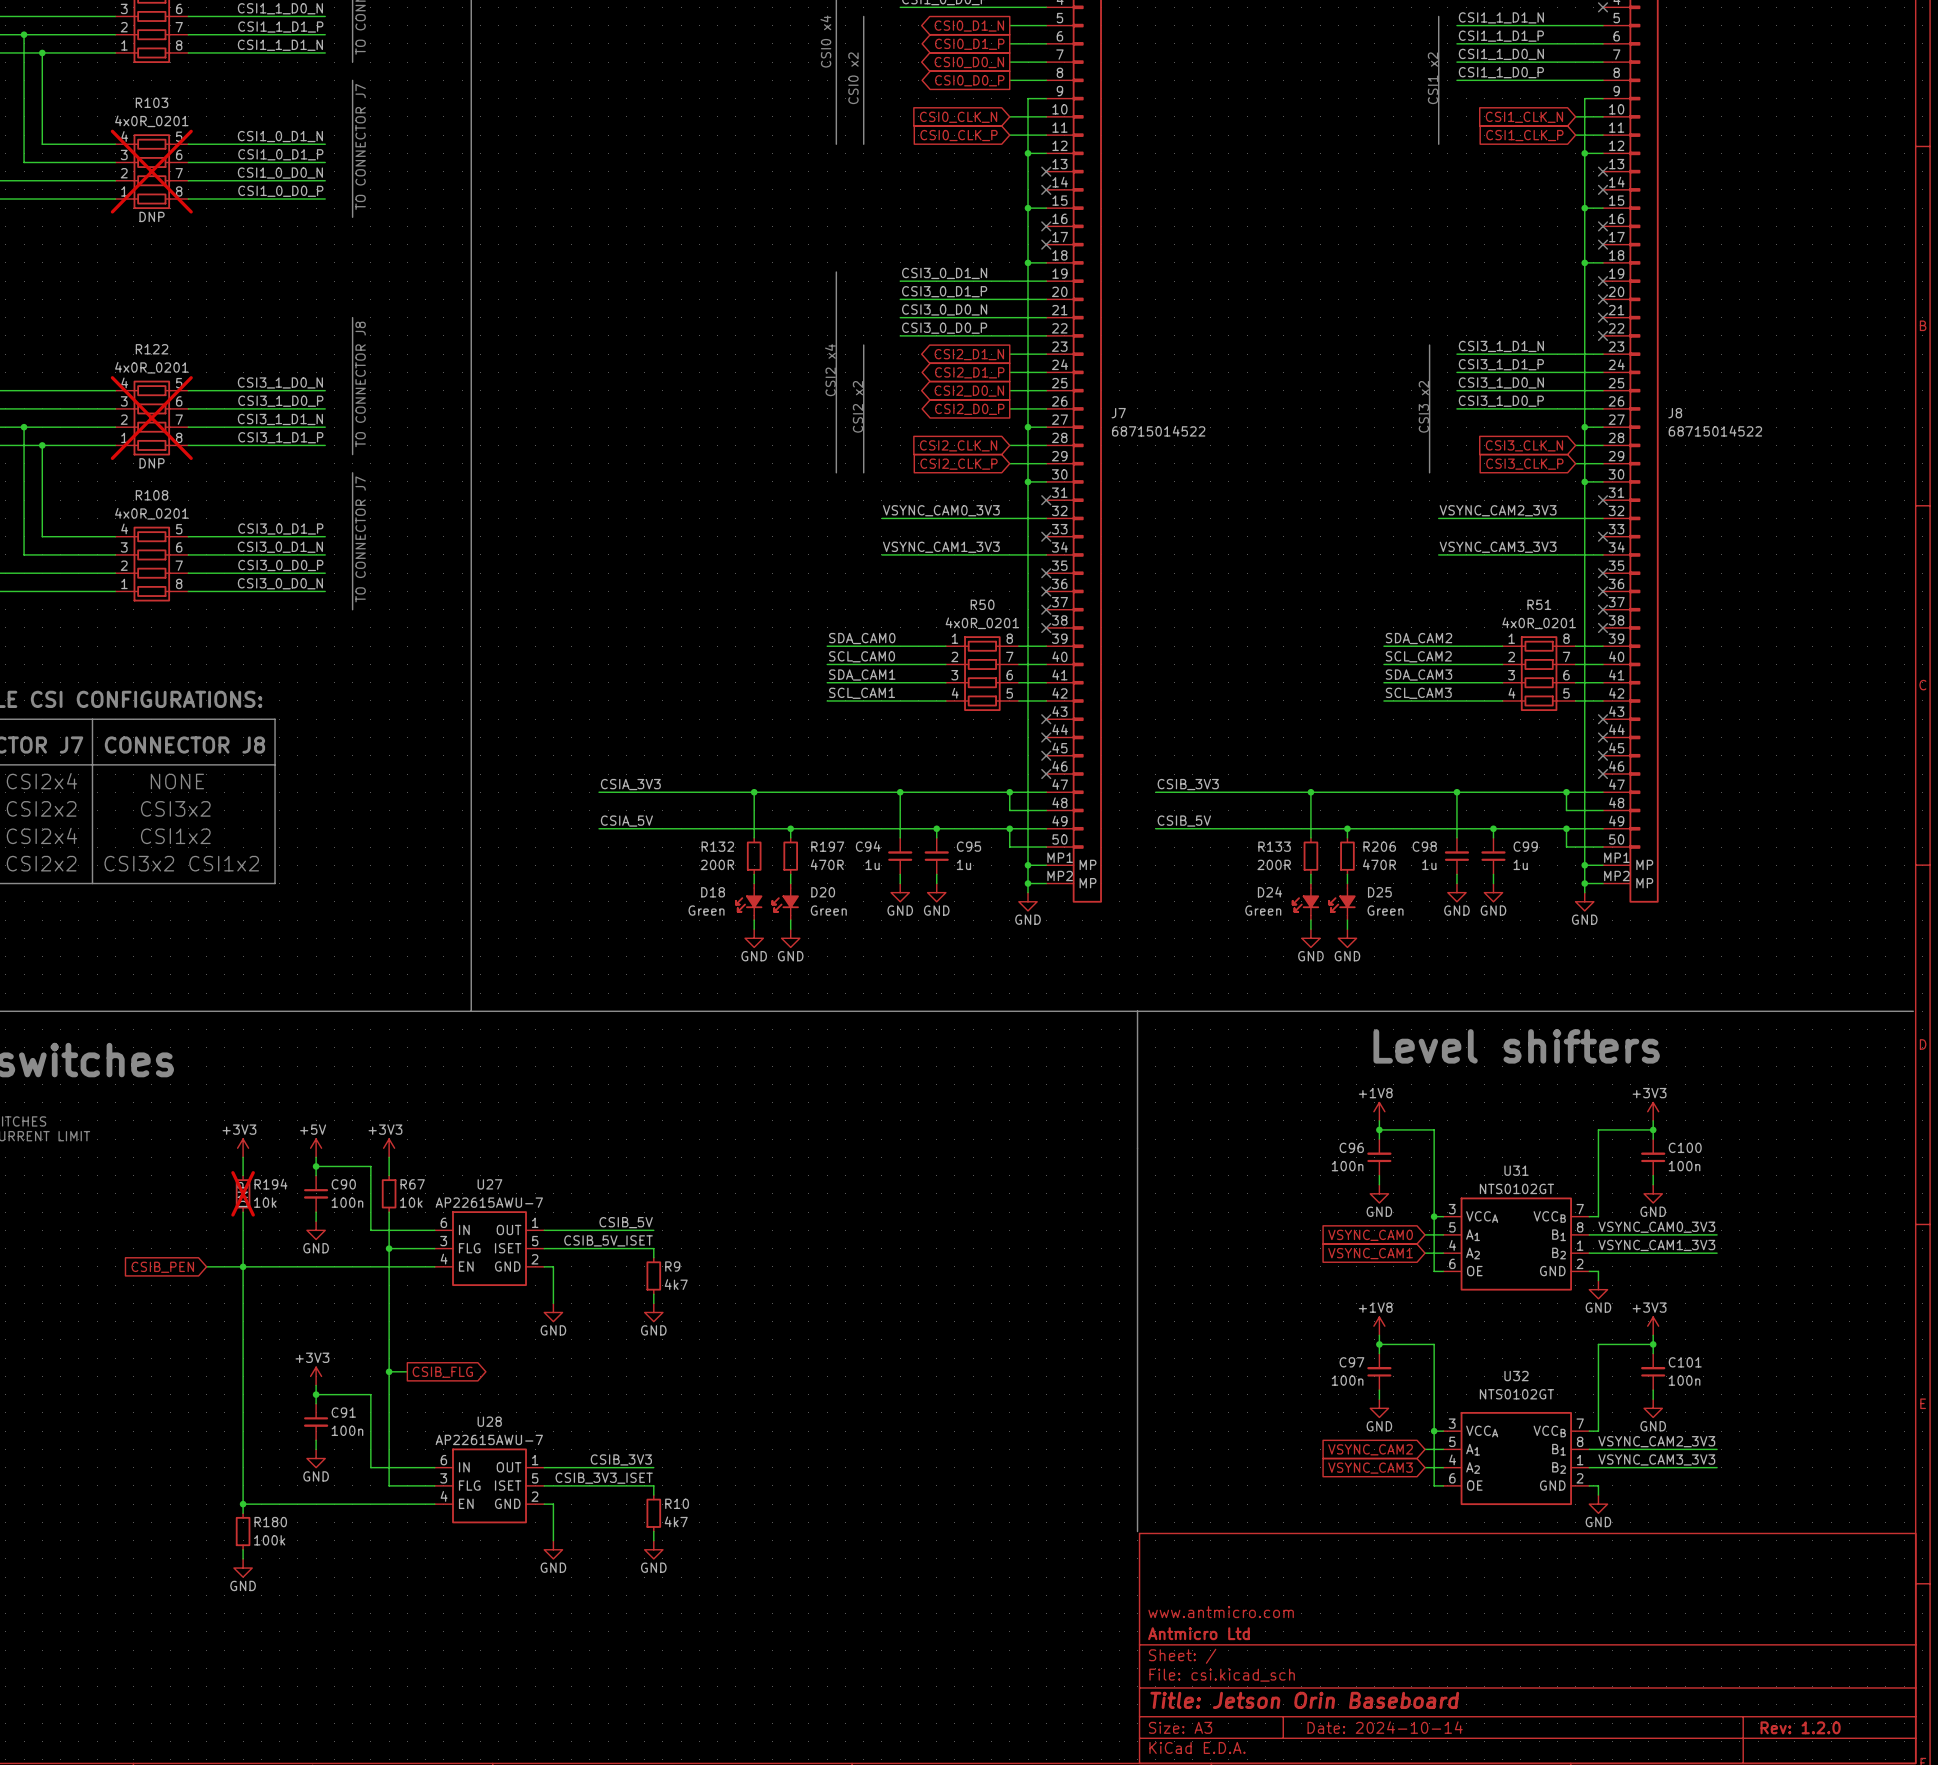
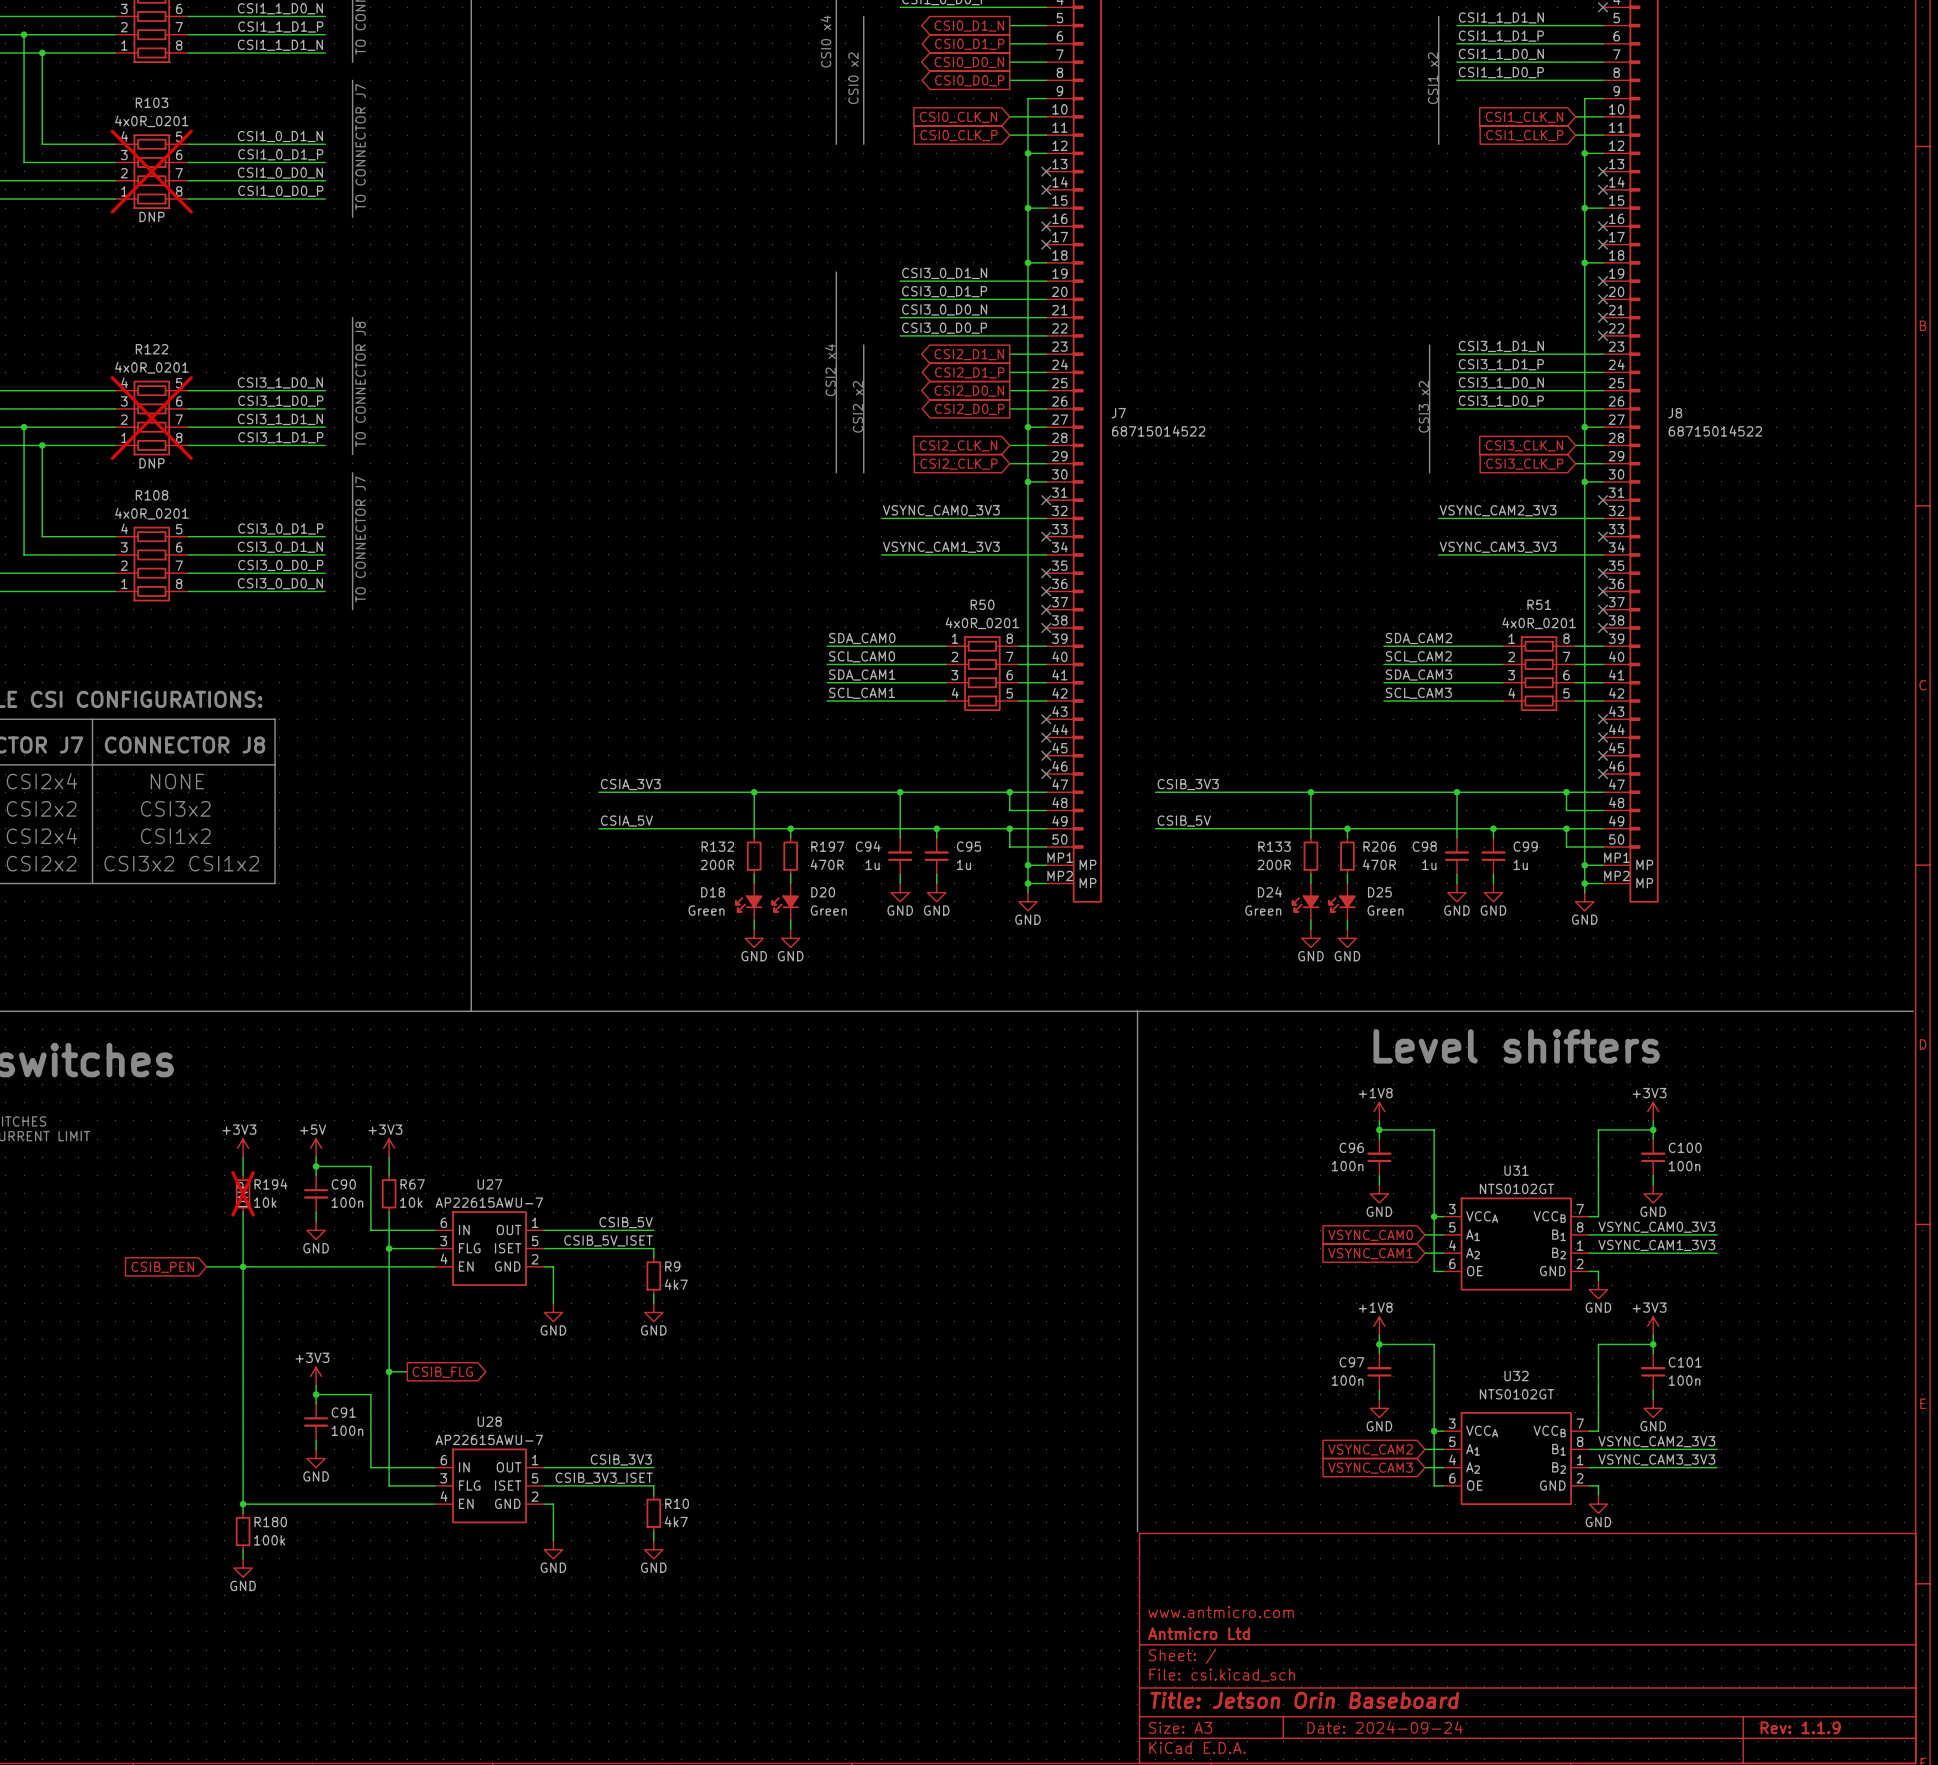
title block: Date: 2024-10-14 (1385, 1727) -> Date: 2024-09-24 (1385, 1727)
title block: Rev: 1.2.0 (1800, 1727) -> Rev: 1.1.9 (1800, 1727)

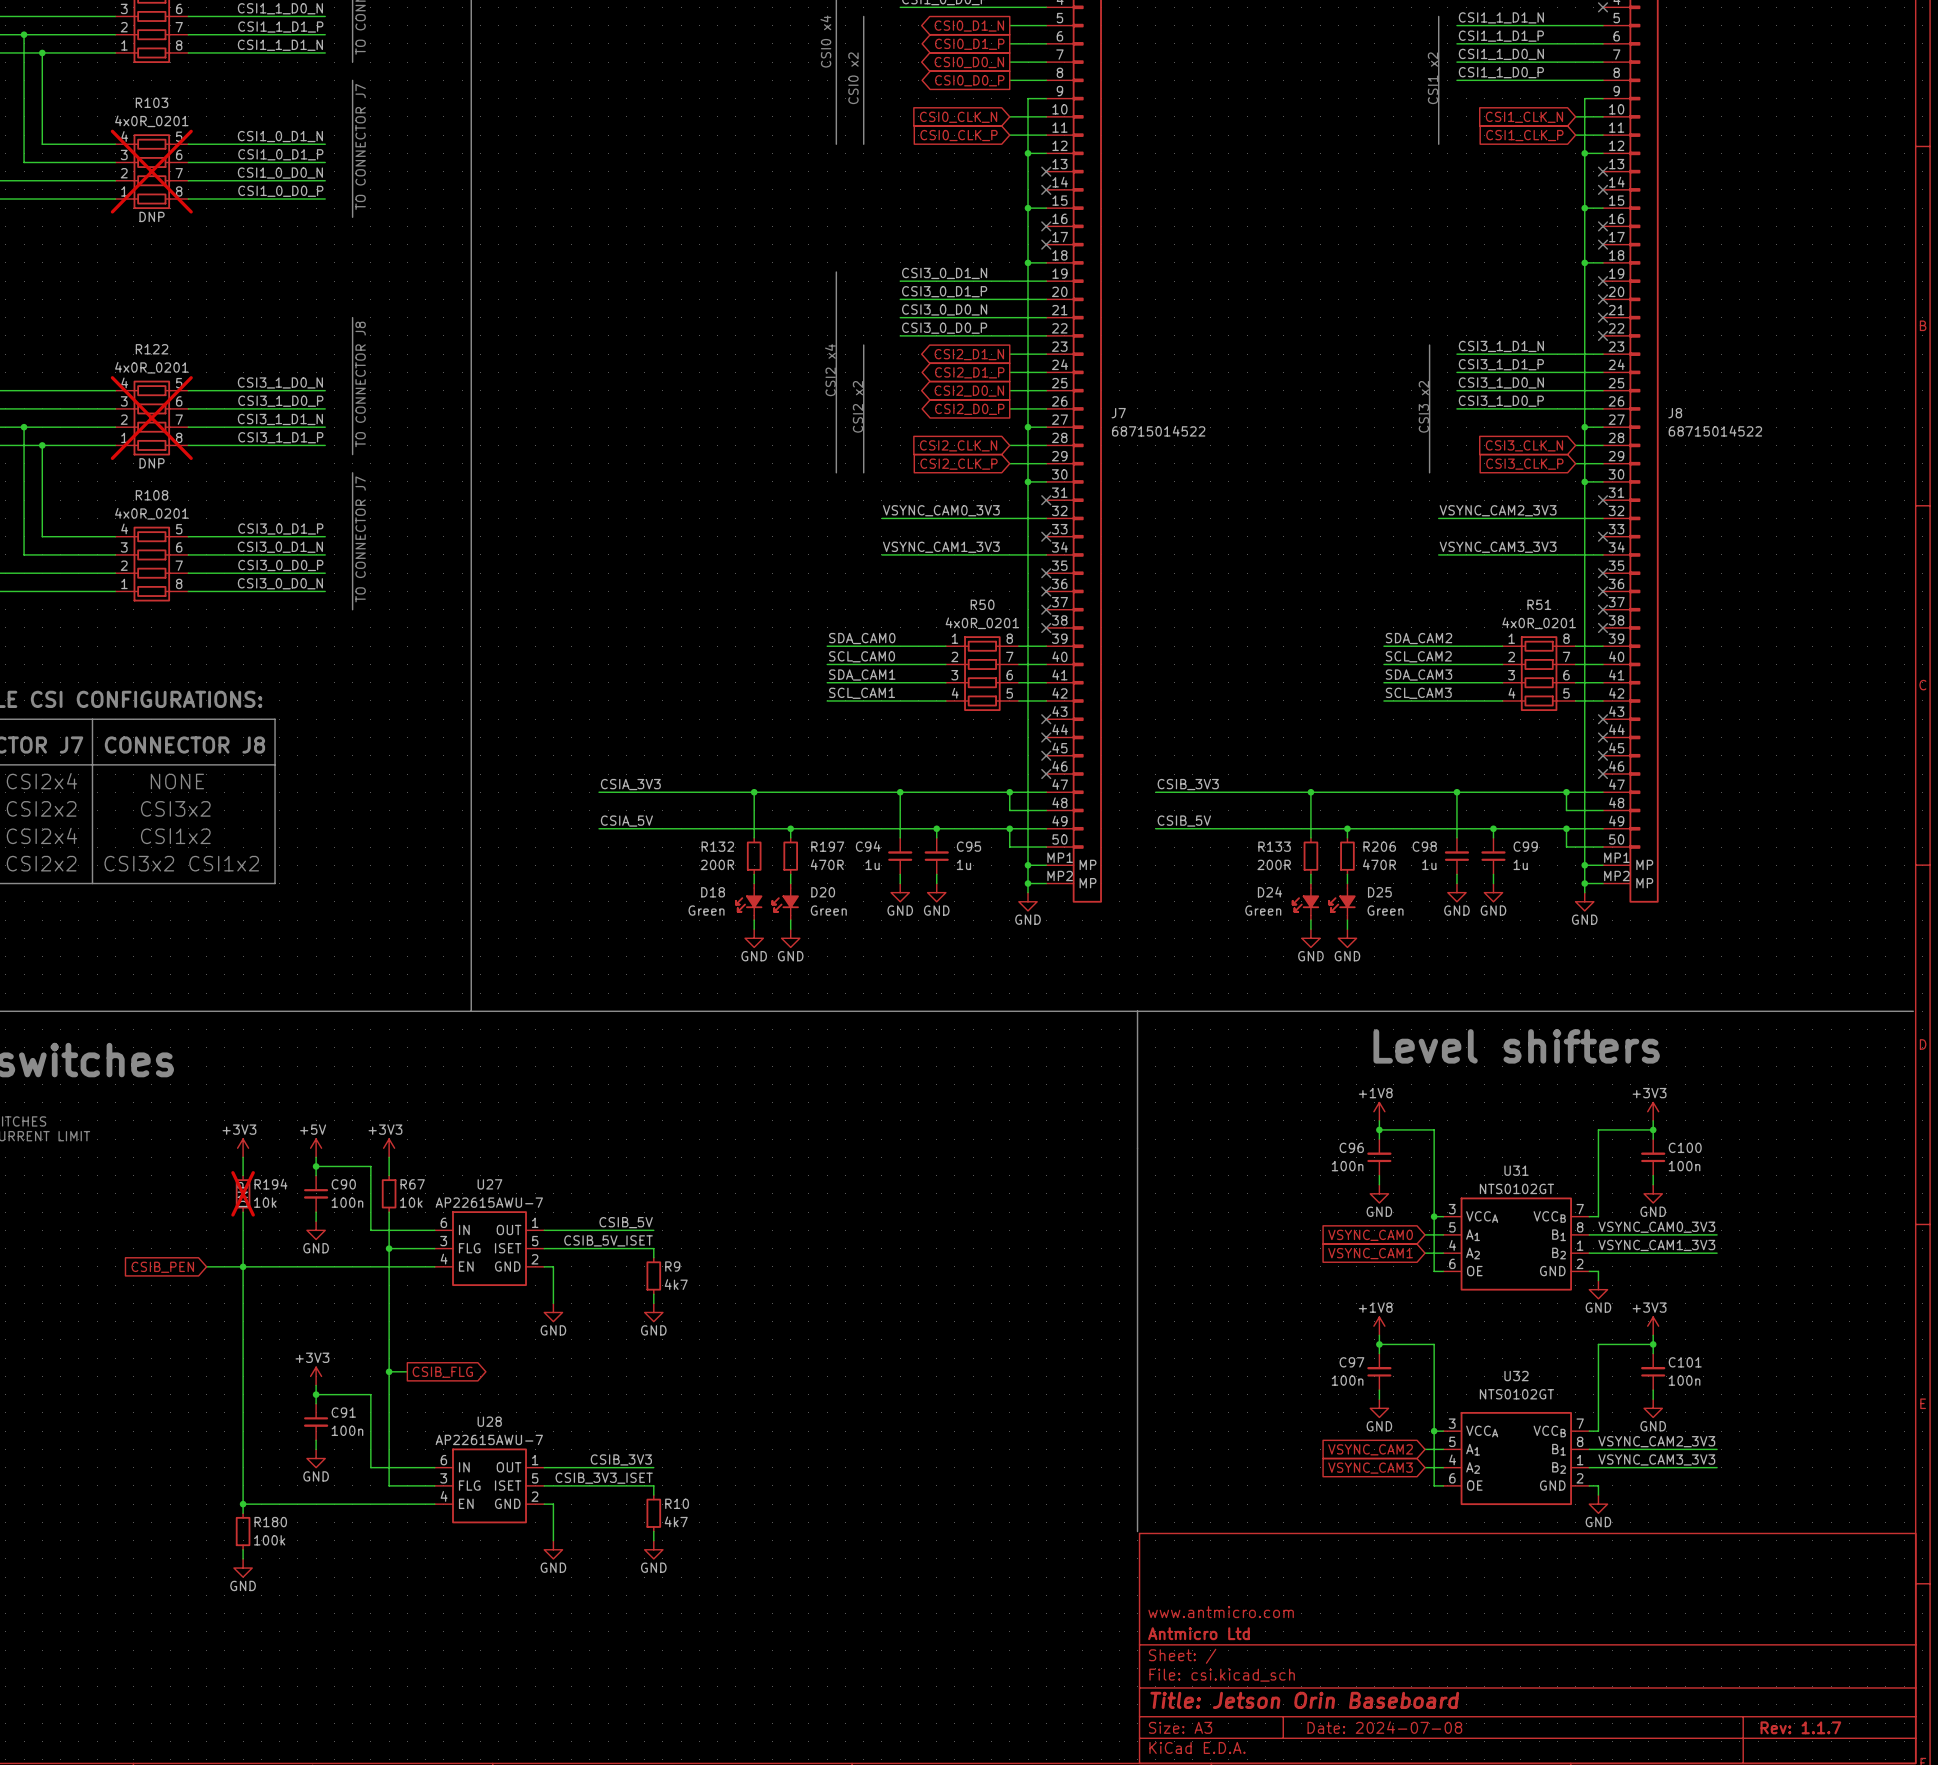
title block: Date: 2024-09-24 (1385, 1727) -> Date: 2024-07-08 (1384, 1727)
title block: Rev: 1.1.9 (1800, 1727) -> Rev: 1.1.7 (1800, 1727)

